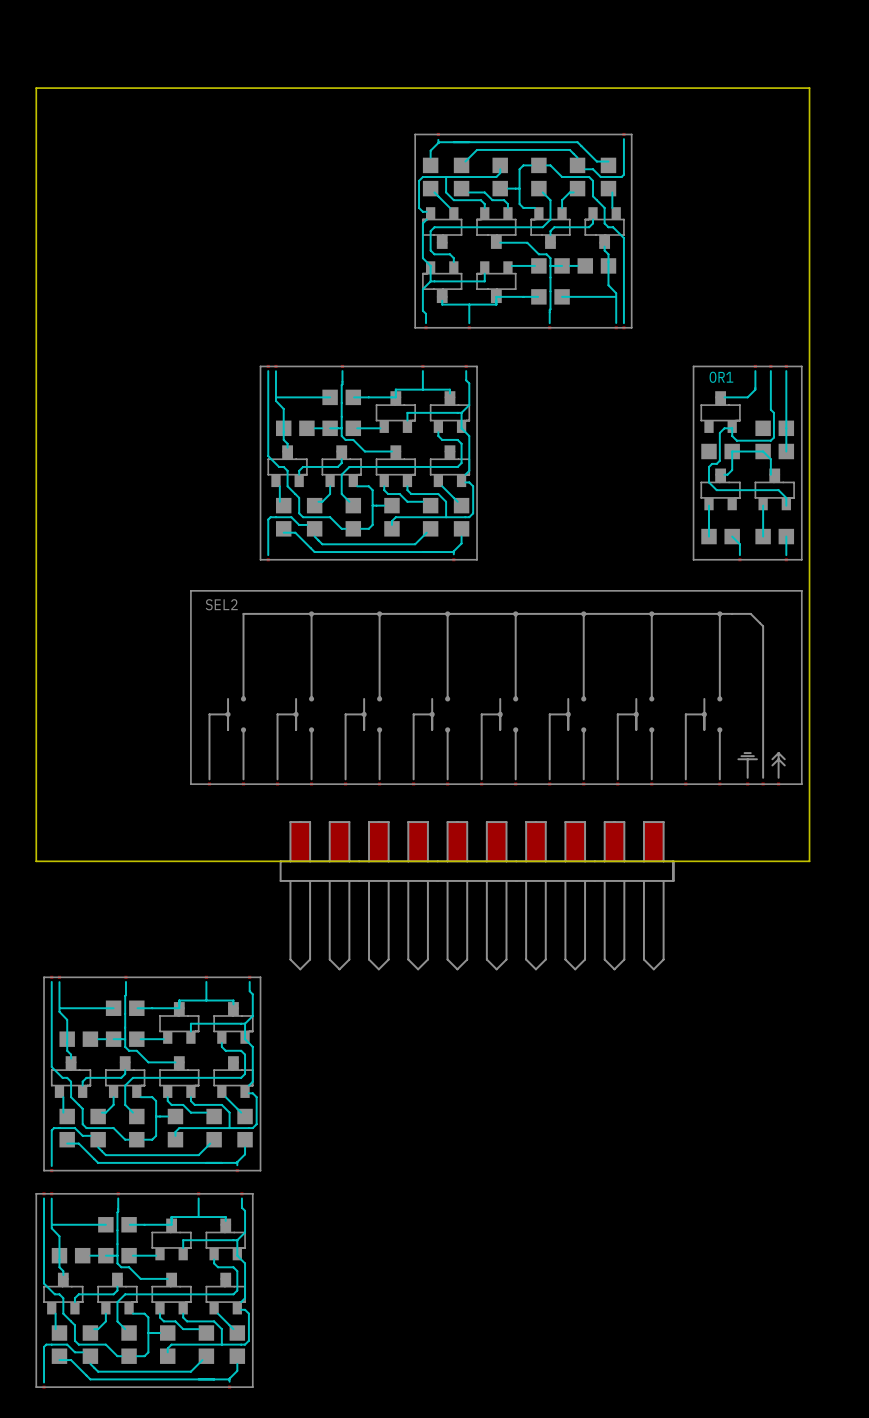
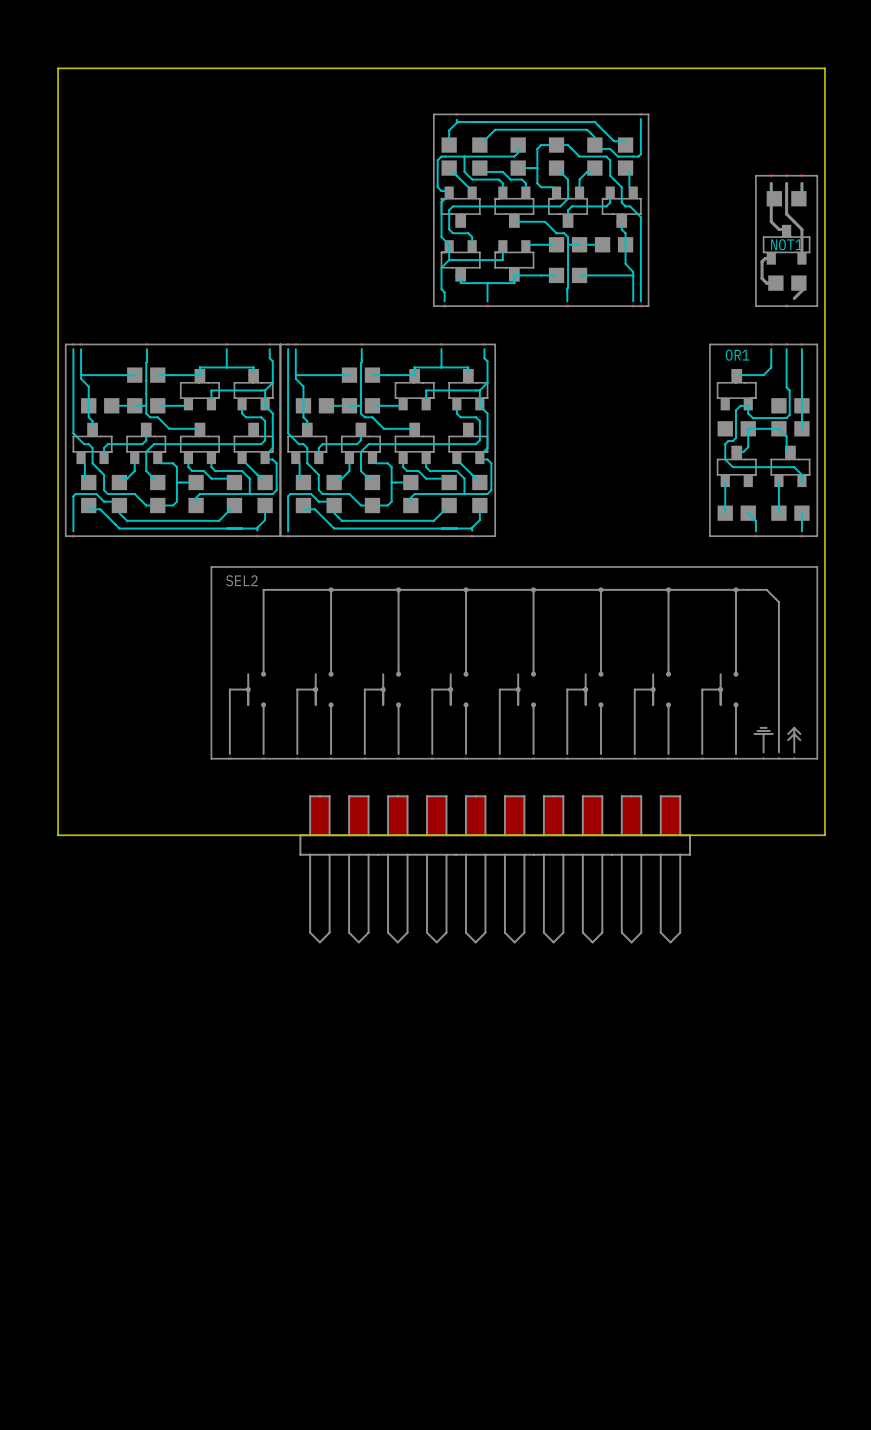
NOT1: none -> (786, 240)
part: none -> (173, 440)
part: (152, 1073) -> none
part: (144, 1290) -> none

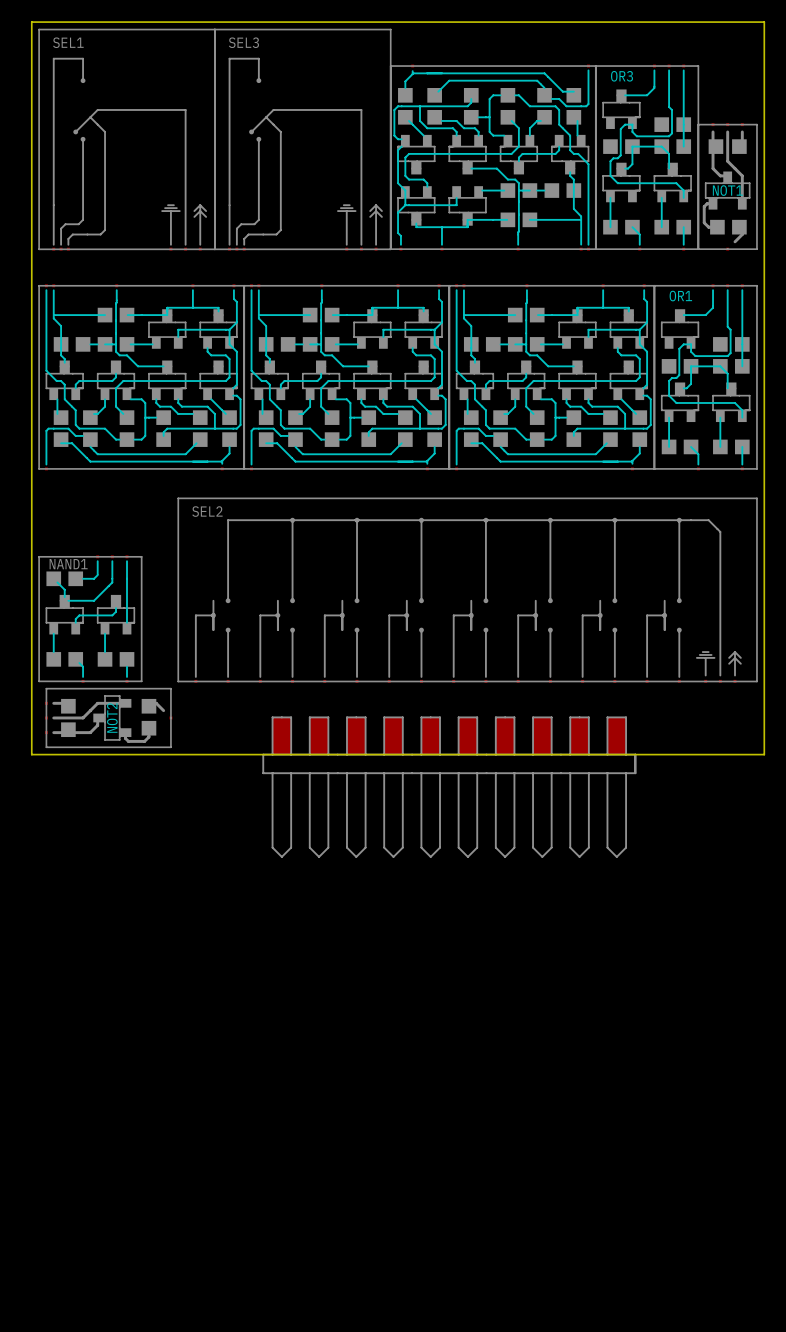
SEL1: none -> (127, 139)
SEL3: none -> (302, 139)
OR3: none -> (647, 157)
part: none -> (551, 377)
NAND1: none -> (90, 619)
NOT2: none -> (108, 717)

